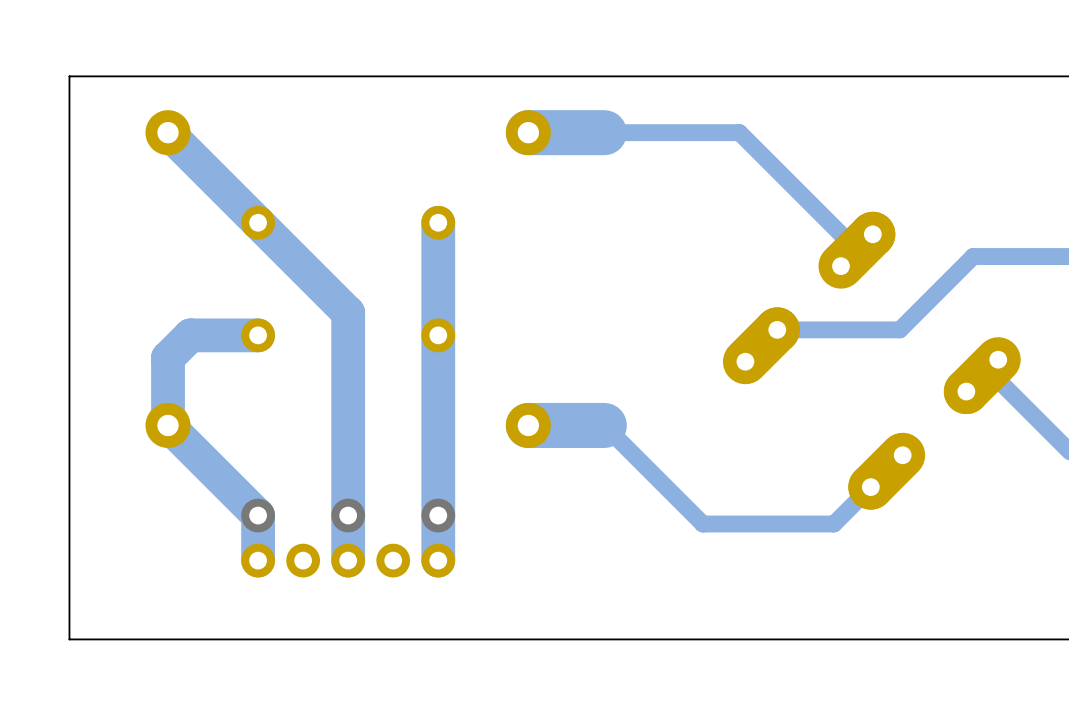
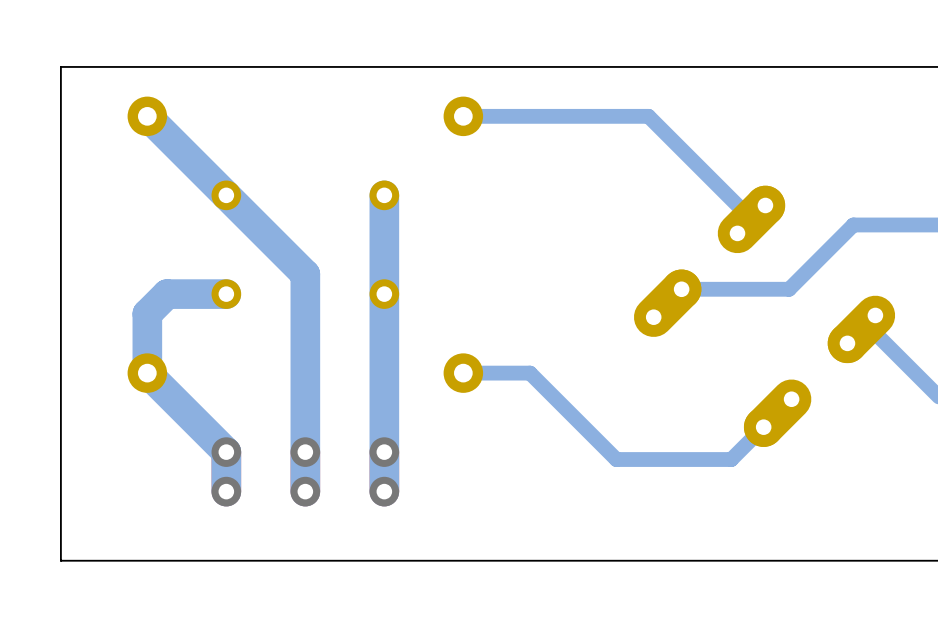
bottom track width: thick (604, 132) (528, 132) -> thin (530, 116) (463, 116)
bottom track width: thick (604, 425) (528, 425) -> thin (530, 373) (463, 373)
via: none -> (226, 491)
part: (348, 560) -> none
via: none -> (305, 491)
via: none -> (384, 491)

